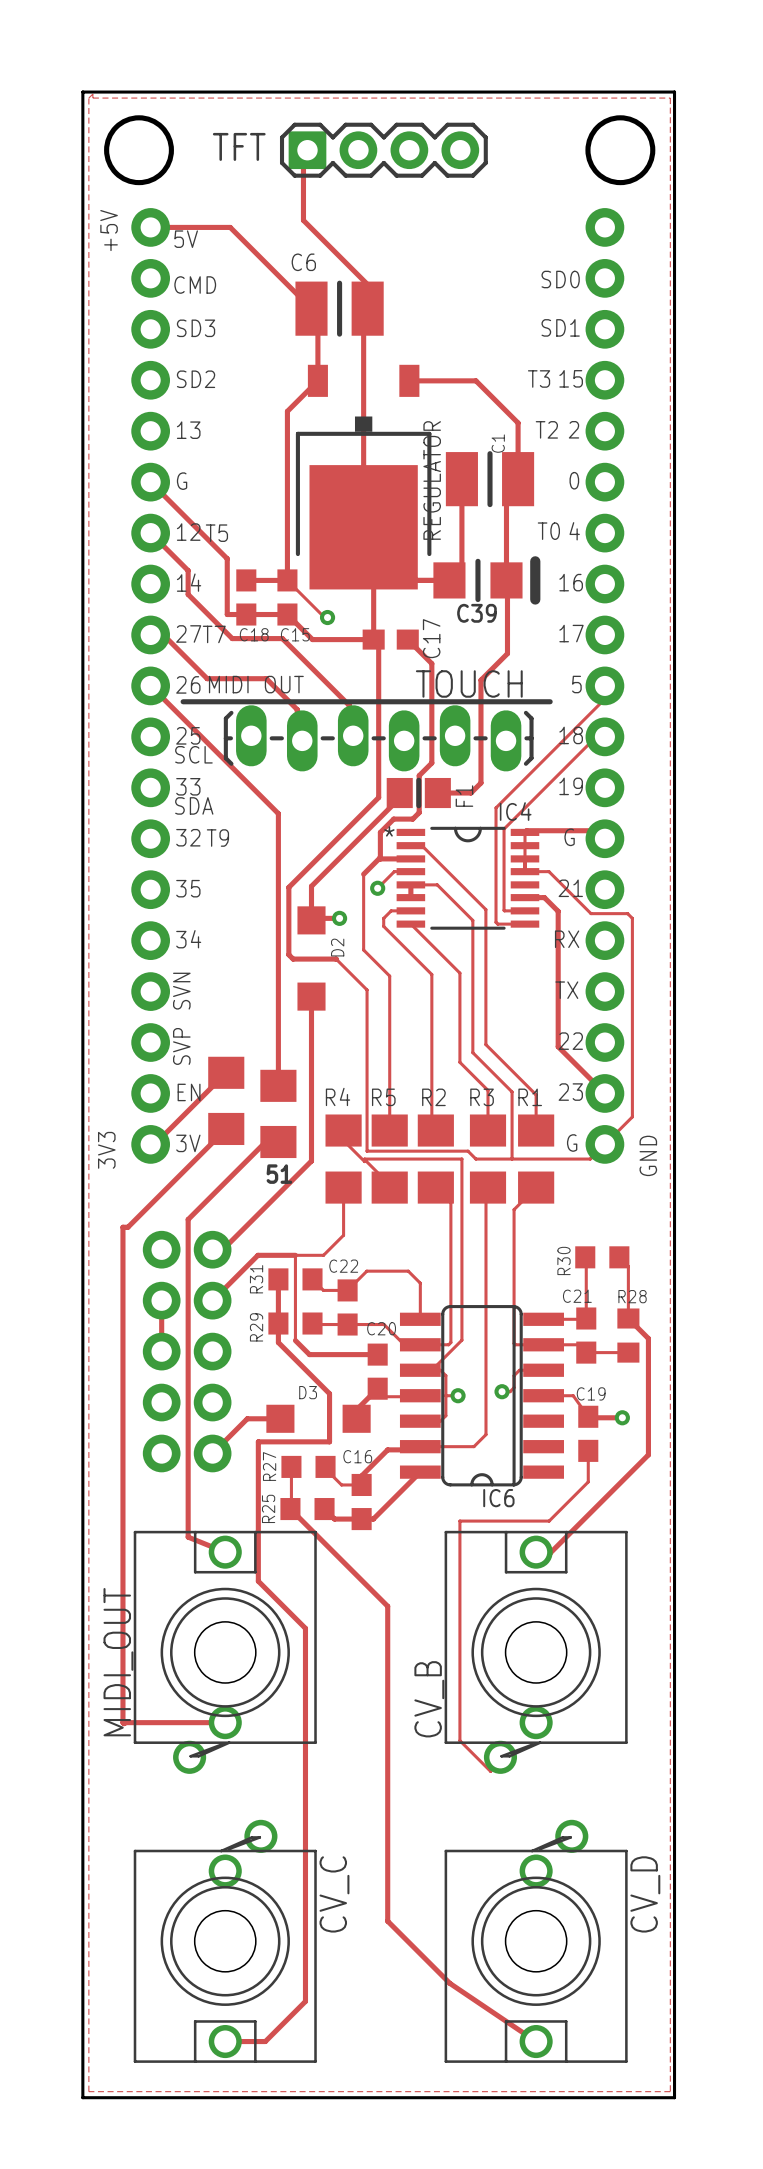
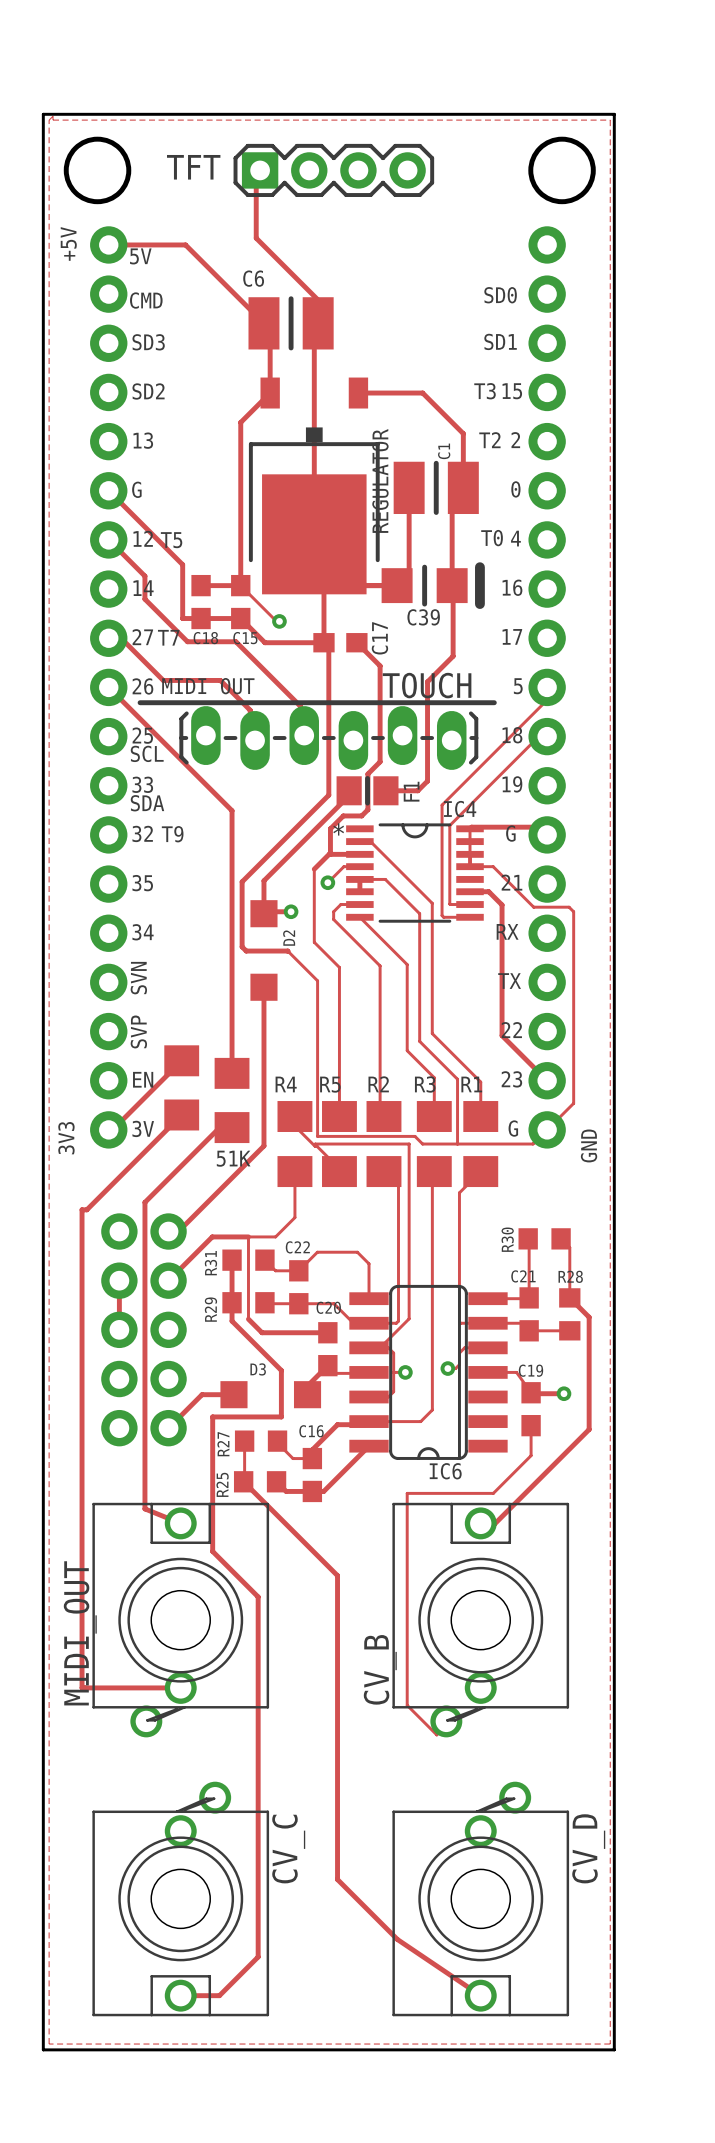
51 name: 51 (279, 1174) -> 51K (233, 1158)

